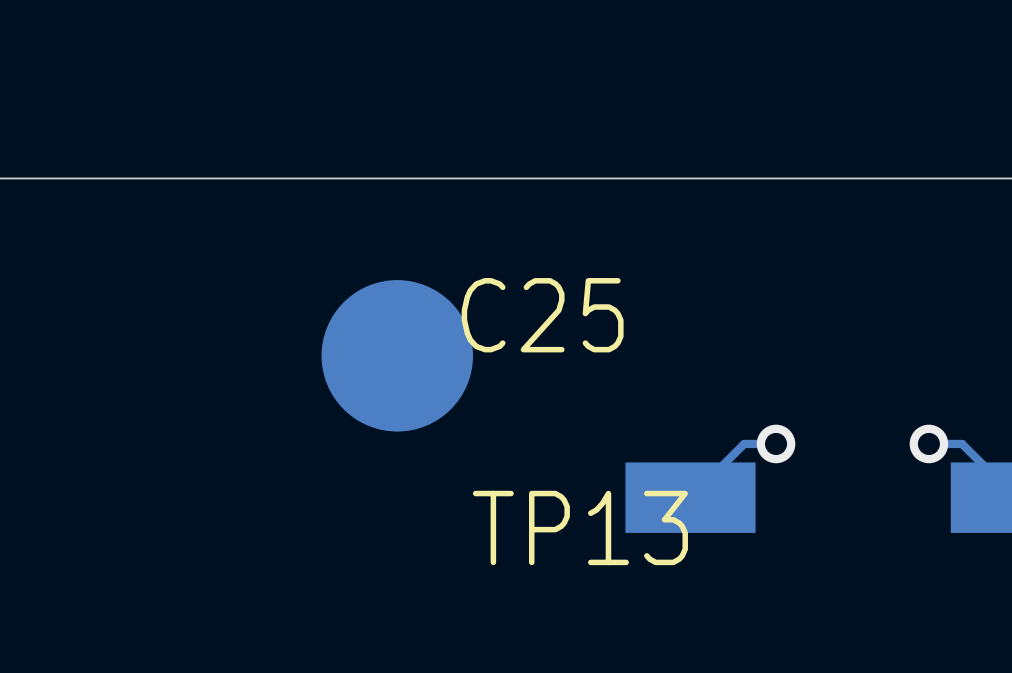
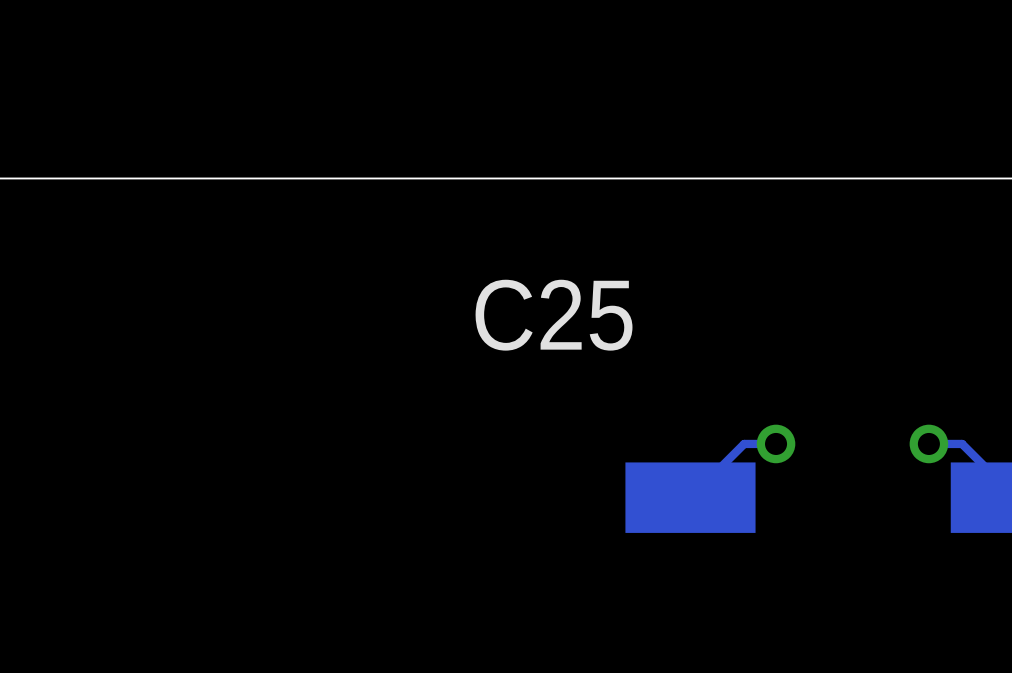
TP13: (397, 355) -> none

